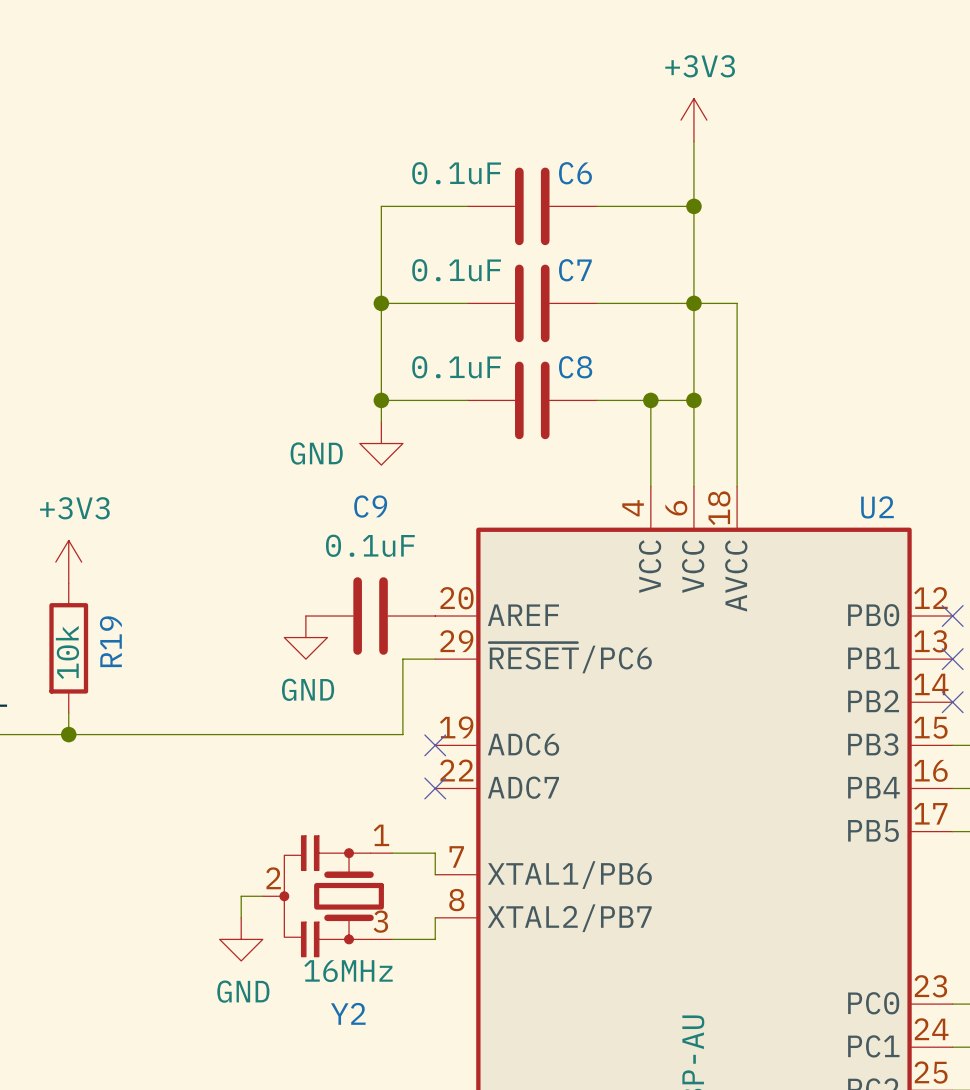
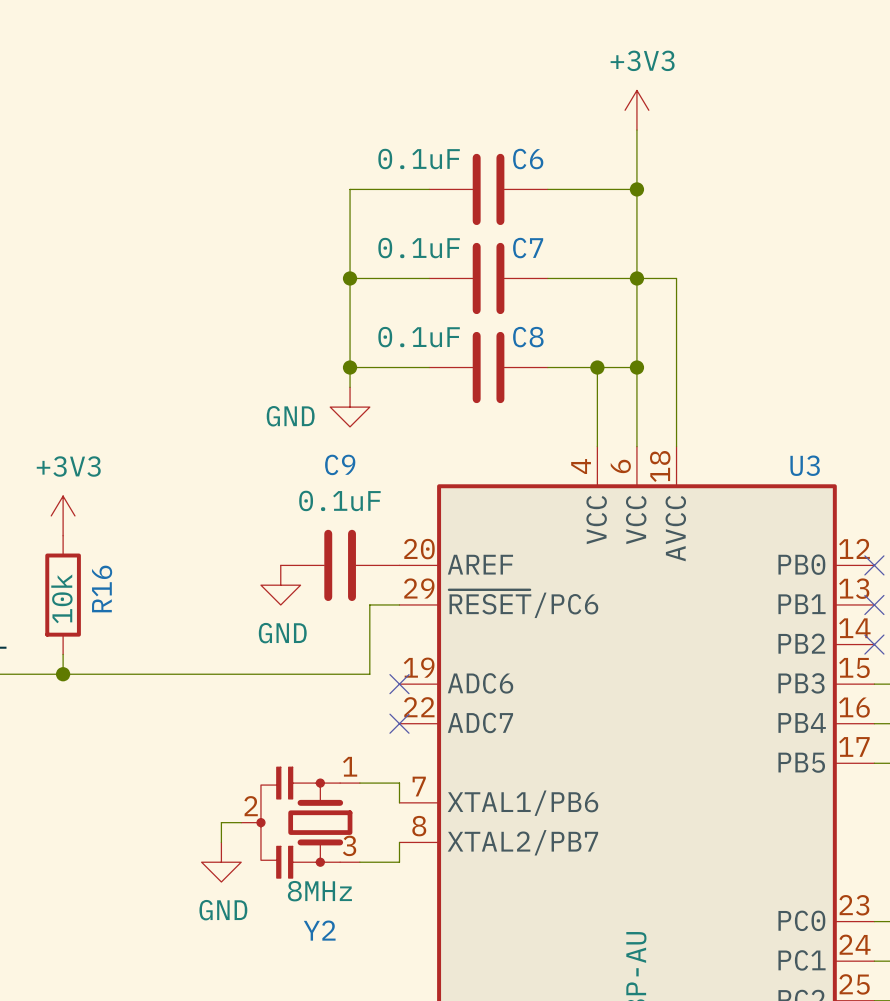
U2 name: U2 (877, 507) -> U3 (805, 465)
R19 name: R19 (110, 641) -> R16 (102, 588)
Y2 value: 16MHz (348, 971) -> 8MHz (319, 891)

